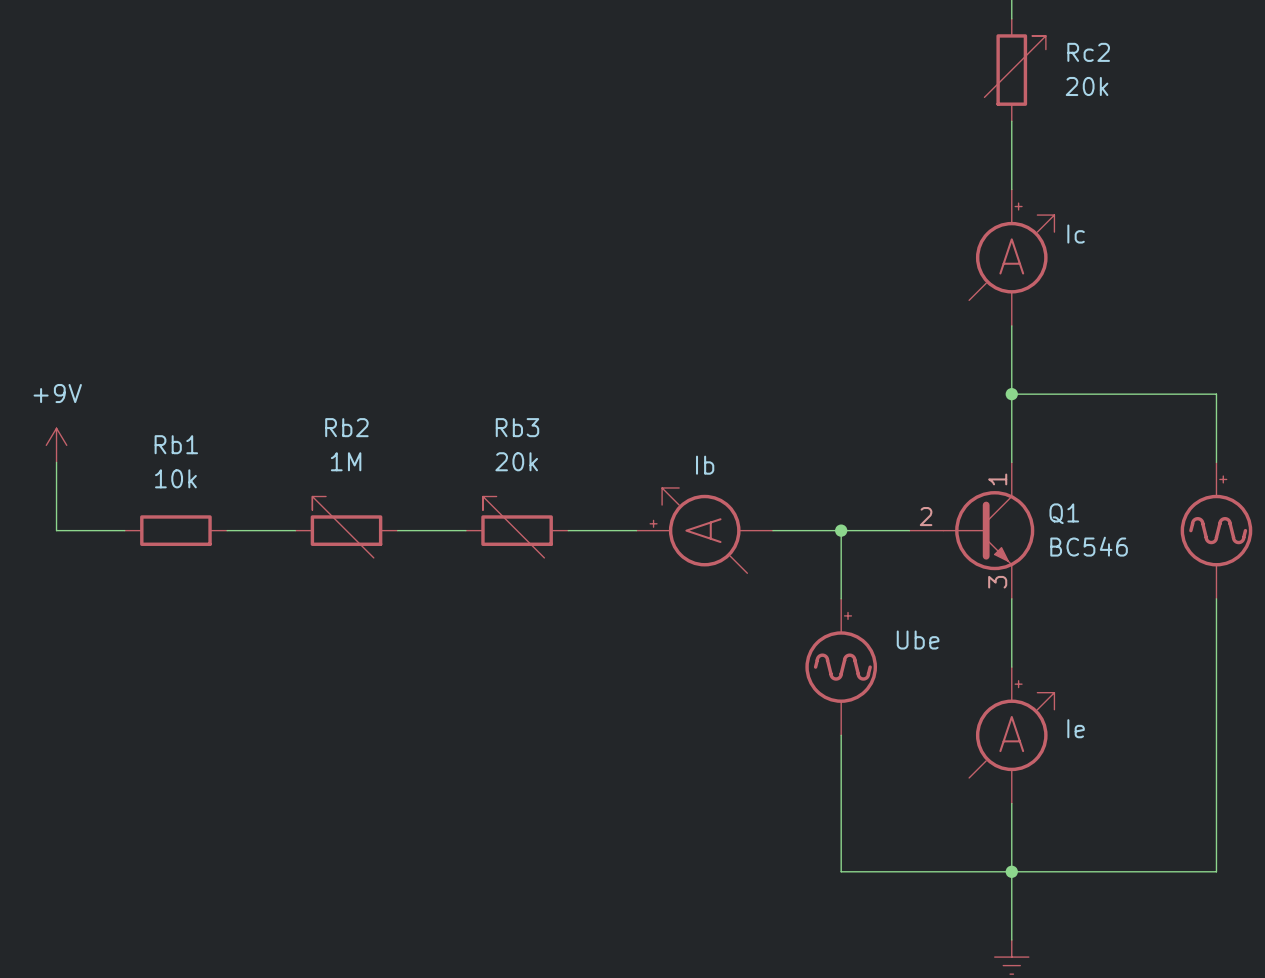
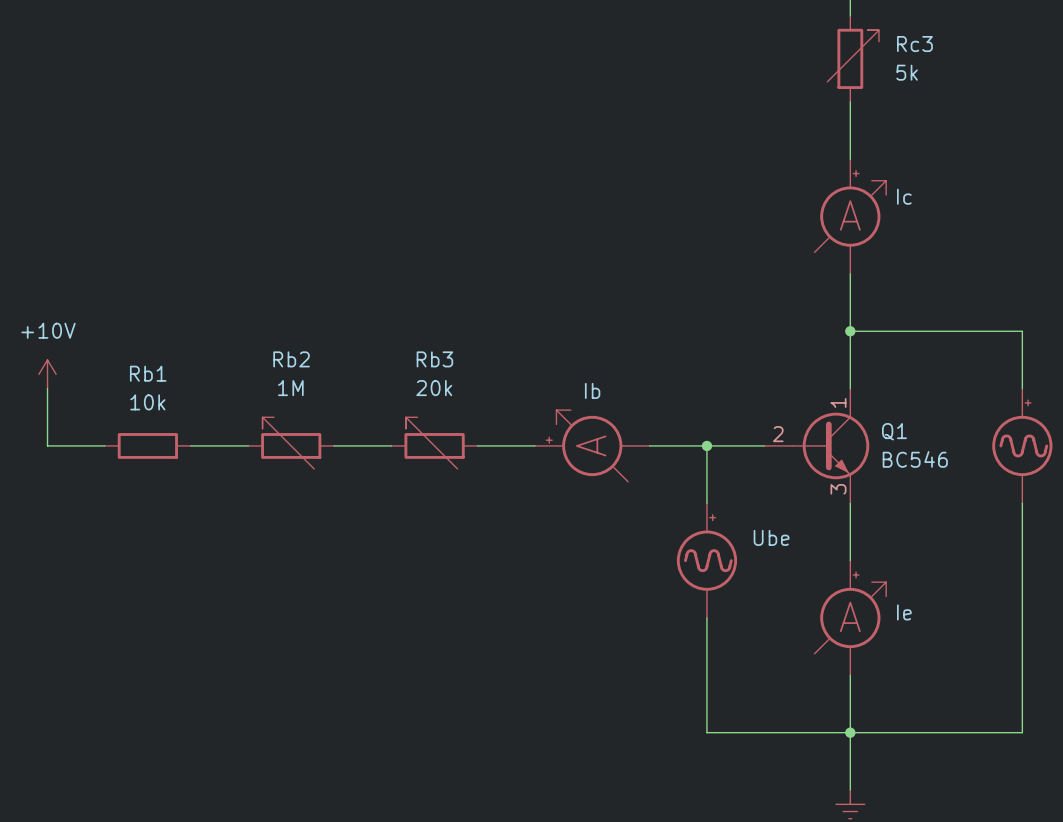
Rc2 name: Rc2 (1088, 52) -> Rc3 (914, 44)
Rc2 value: 20k (1087, 86) -> 5k (907, 72)
power symbol: +9V (56, 445) -> +10V (47, 374)

